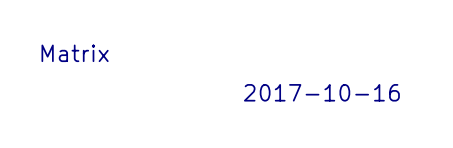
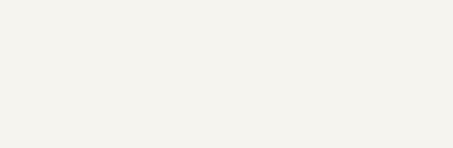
text: Matrix (75, 53) -> none
text: 2017-10-16 (321, 92) -> none

